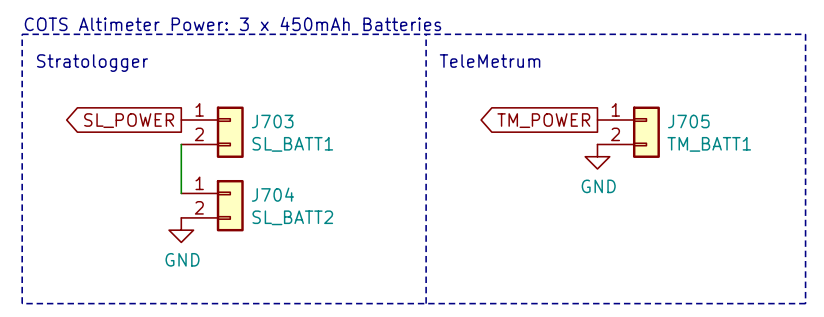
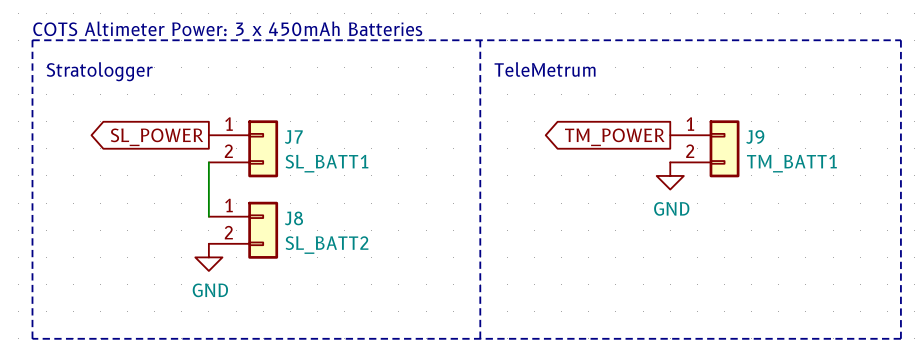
J703 name: J703 (272, 121) -> J7 (293, 137)
J705 name: J705 (688, 121) -> J9 (755, 137)
J704 name: J704 (272, 194) -> J8 (293, 218)

